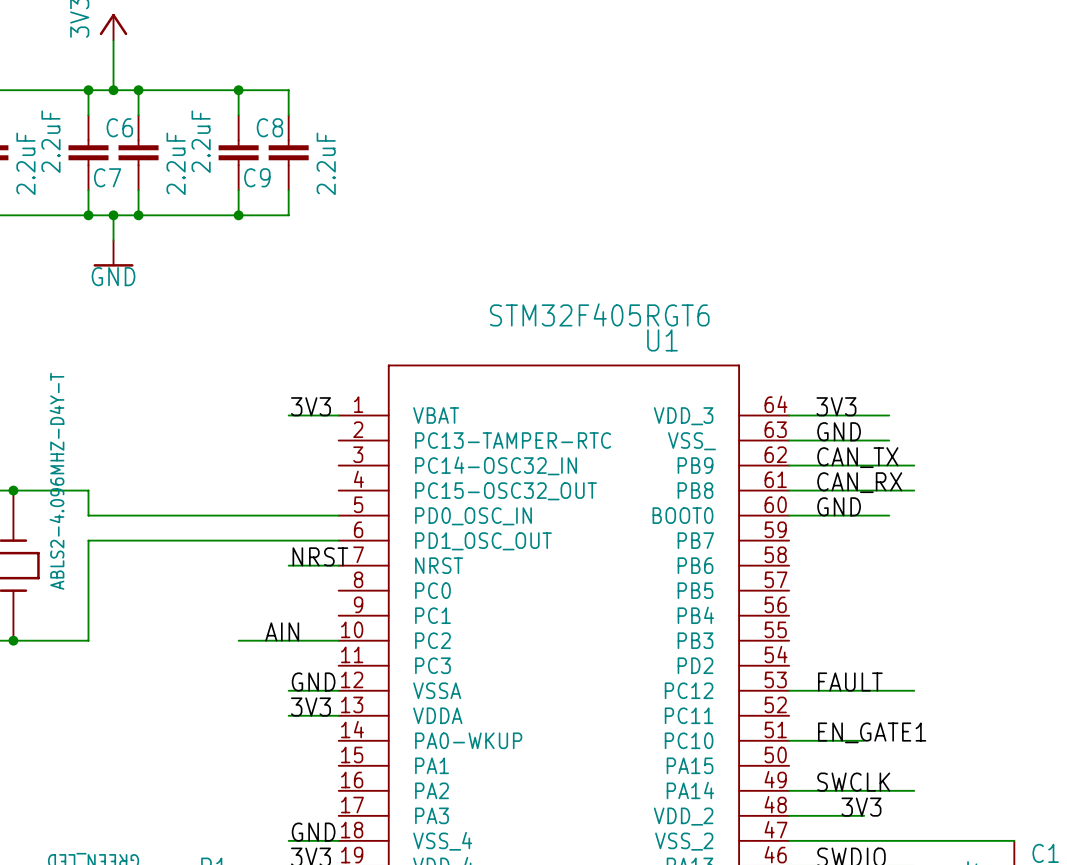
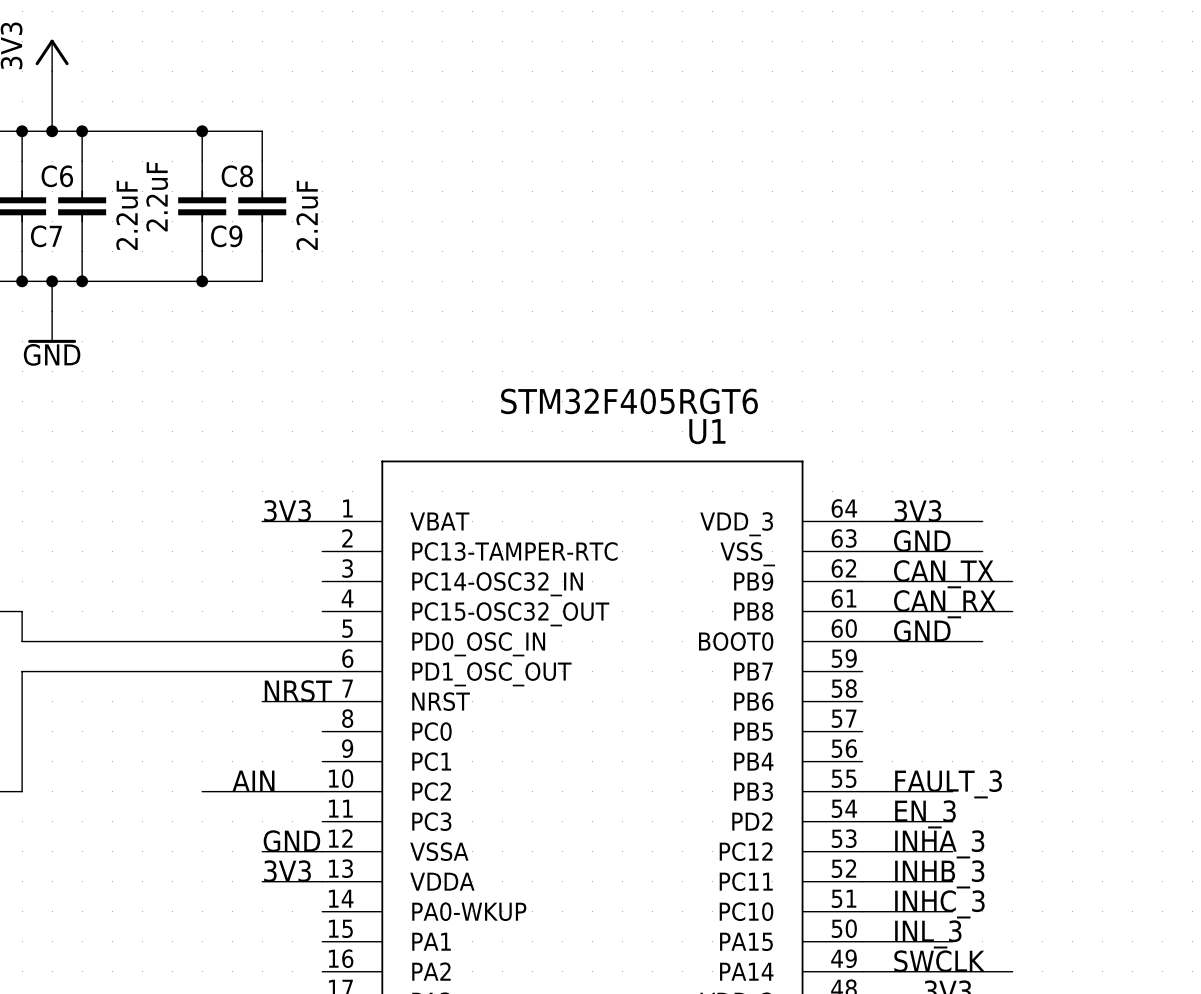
label: none -> FAULT_3 (948, 784)
wire: none -> (862, 791) (952, 791)
label: none -> EN_3 (925, 814)
wire: none -> (862, 821) (952, 821)
label: FAULT (850, 681) -> INHA_3 (939, 844)
wire: (864, 690) (914, 690) -> none
label: none -> INHB_3 (939, 874)
wire: none -> (862, 881) (952, 881)
label: EN_GATE1 (872, 732) -> INHC_3 (939, 904)
label: none -> INL_3 (928, 934)
wire: none -> (862, 941) (952, 941)

